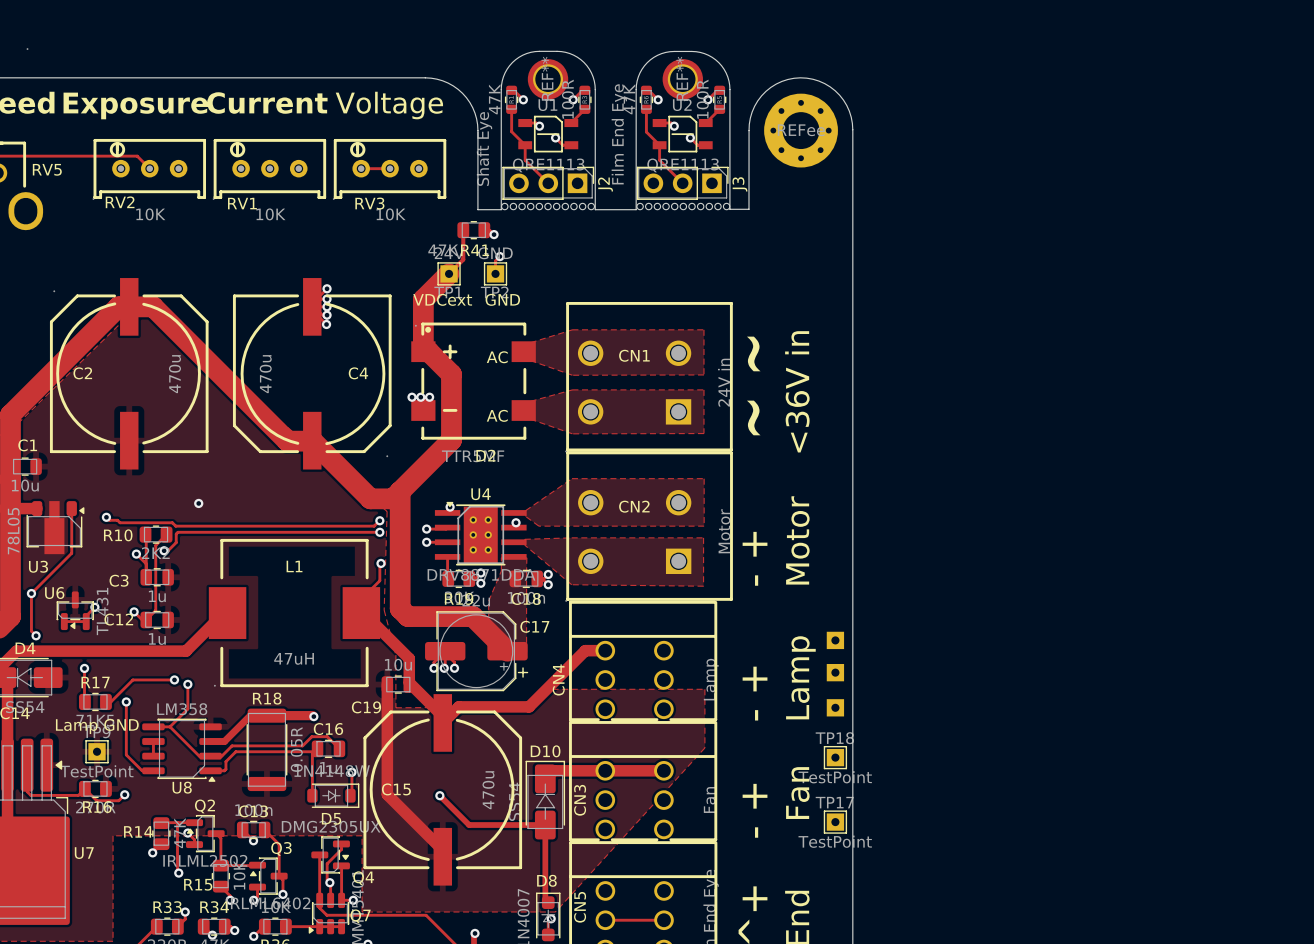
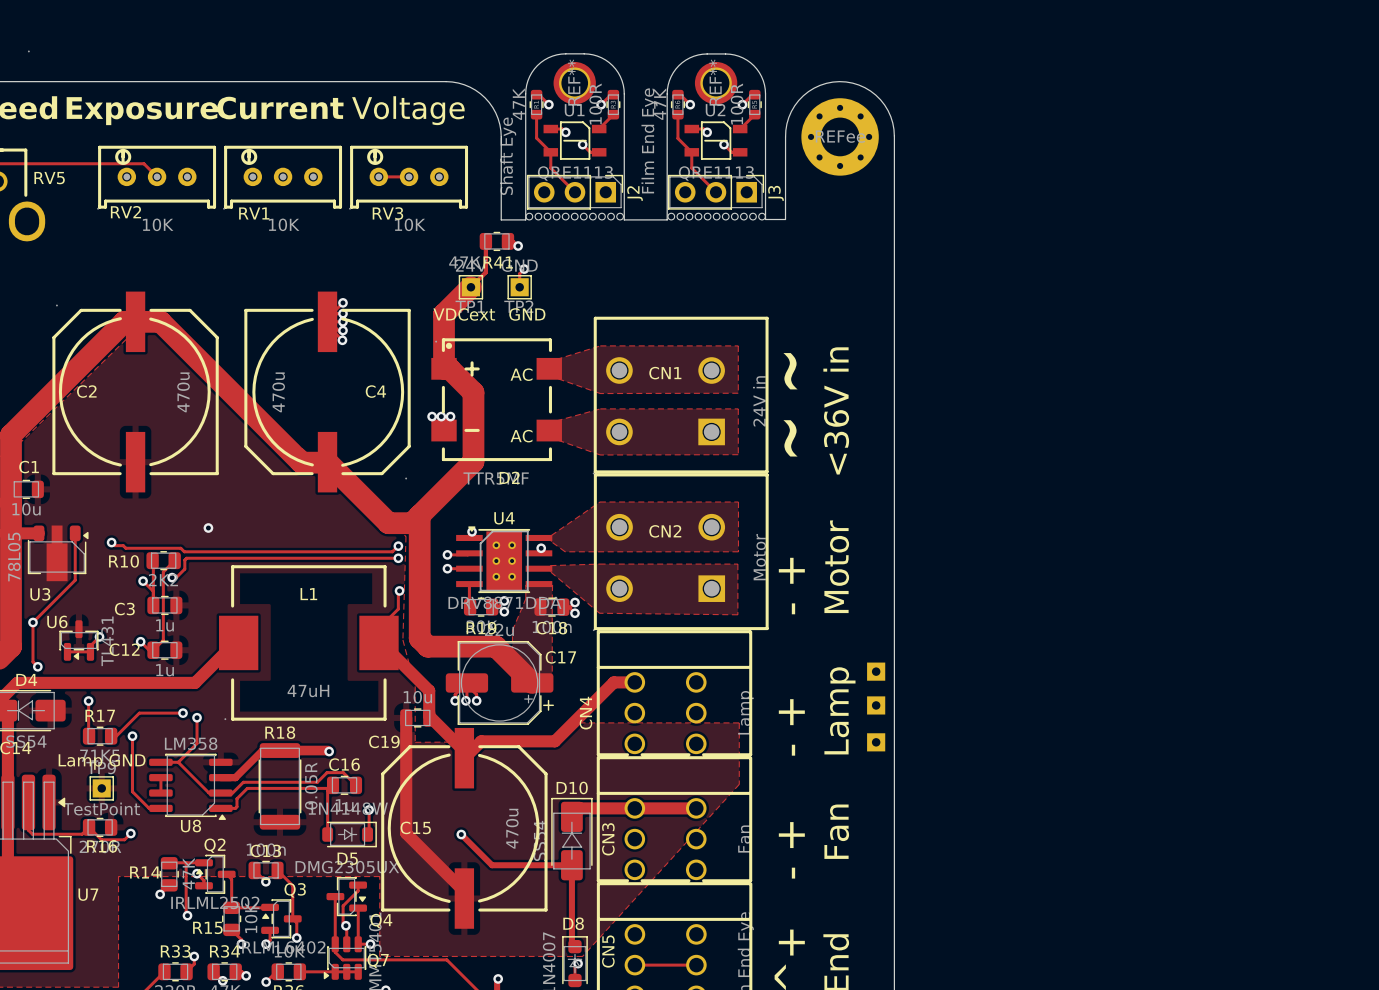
TP18: TestPoint (835, 757) -> none
TP17: TestPoint (835, 822) -> none

